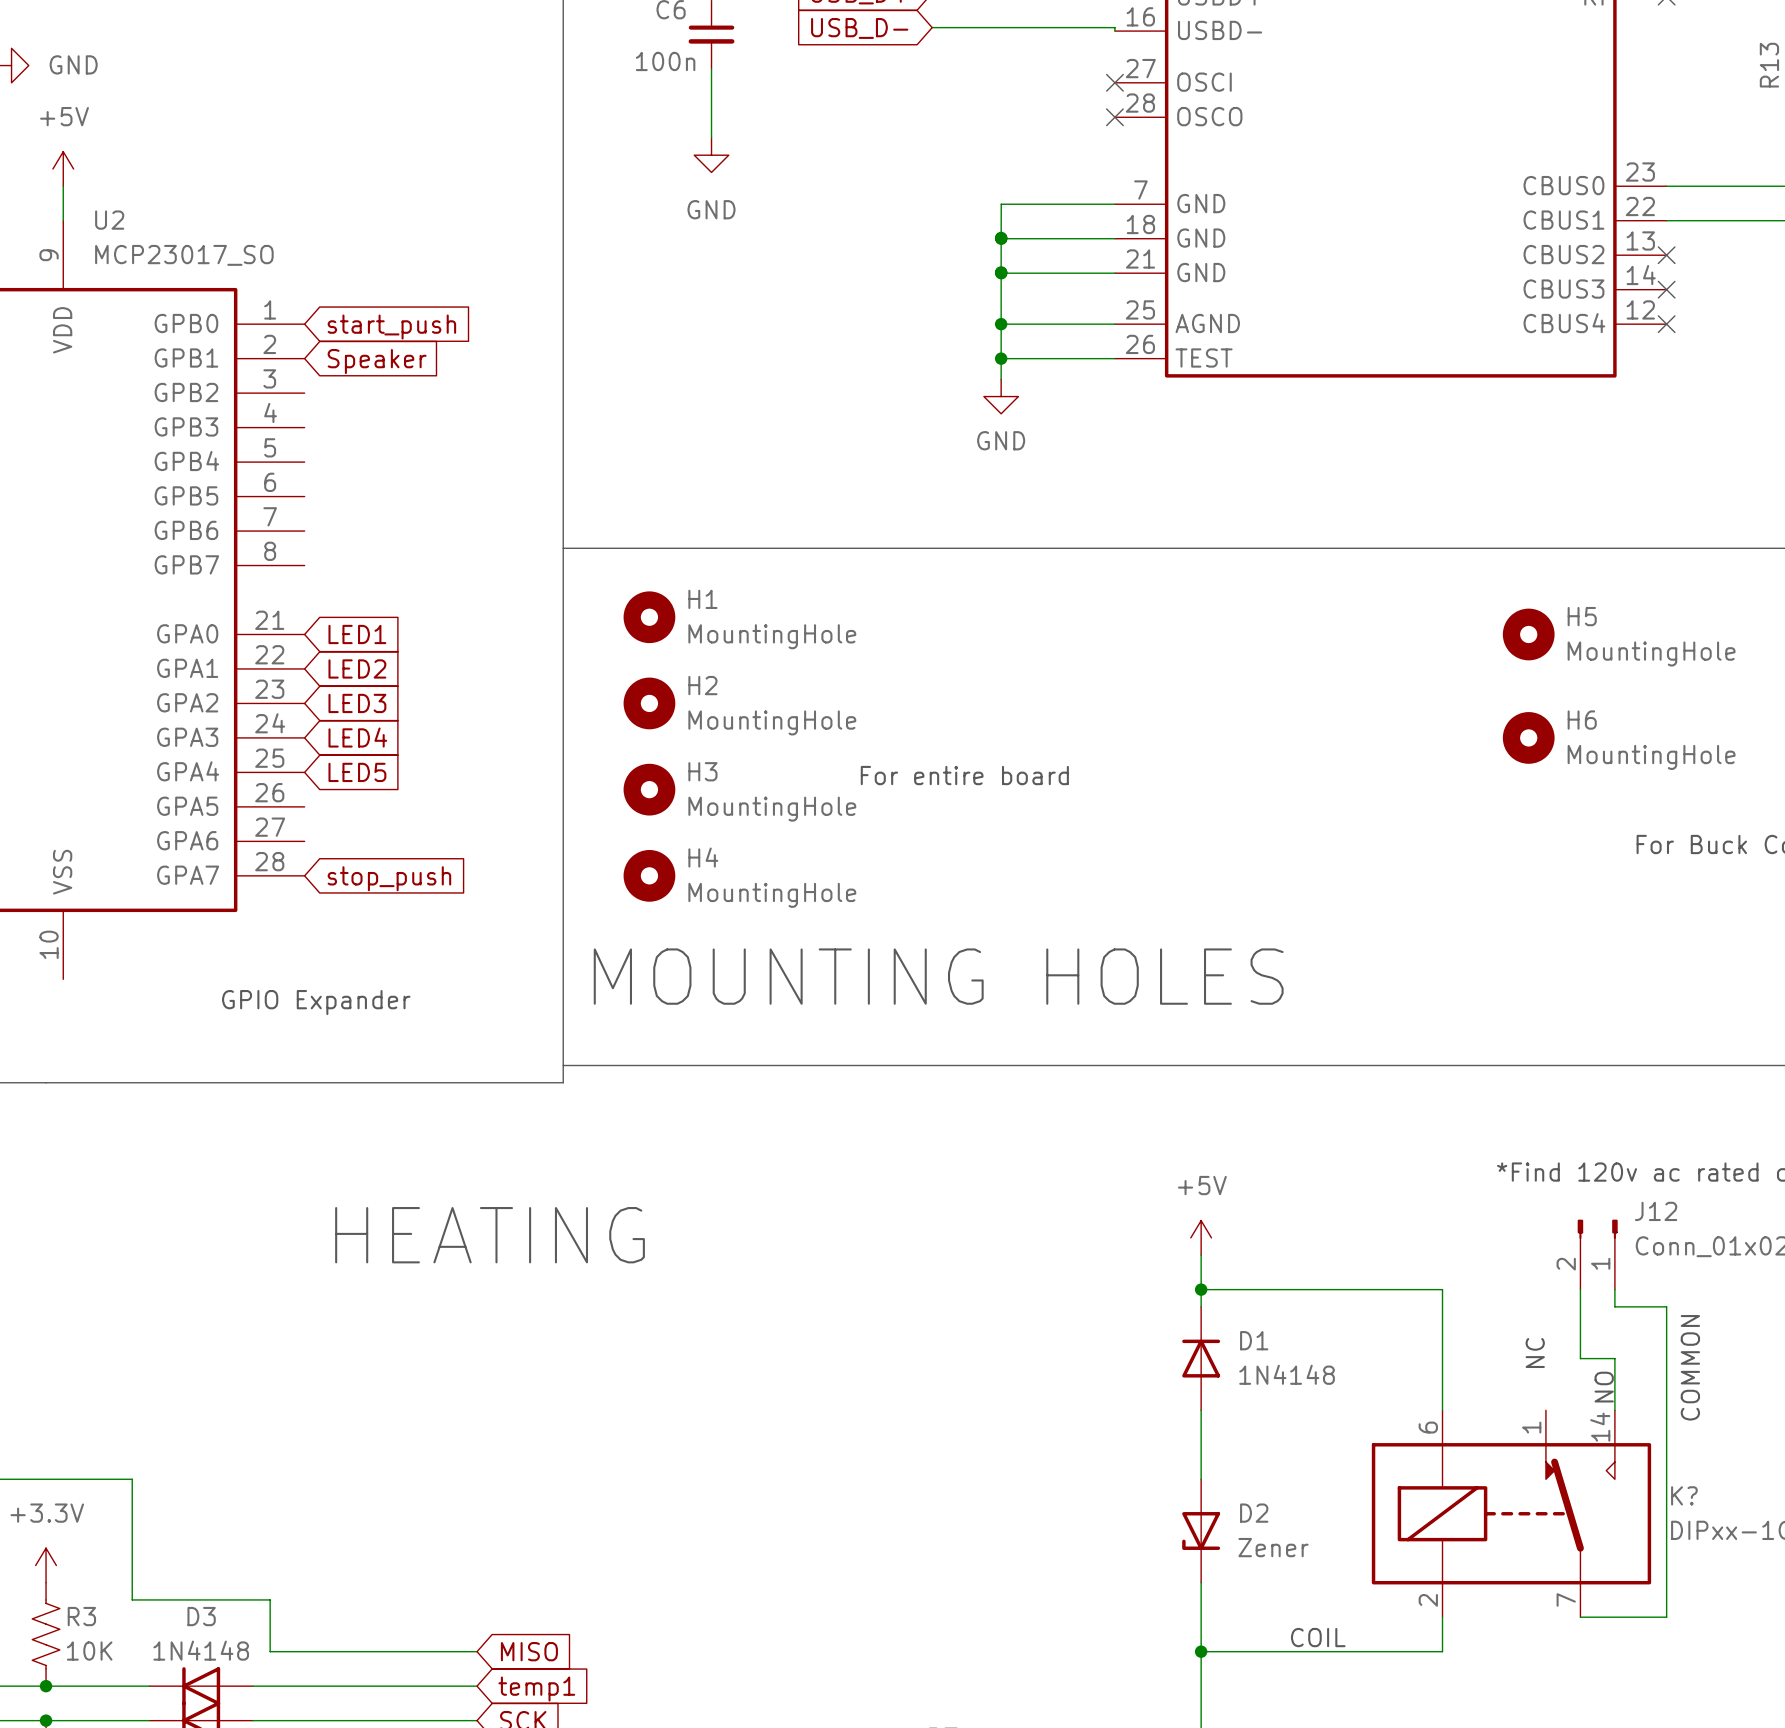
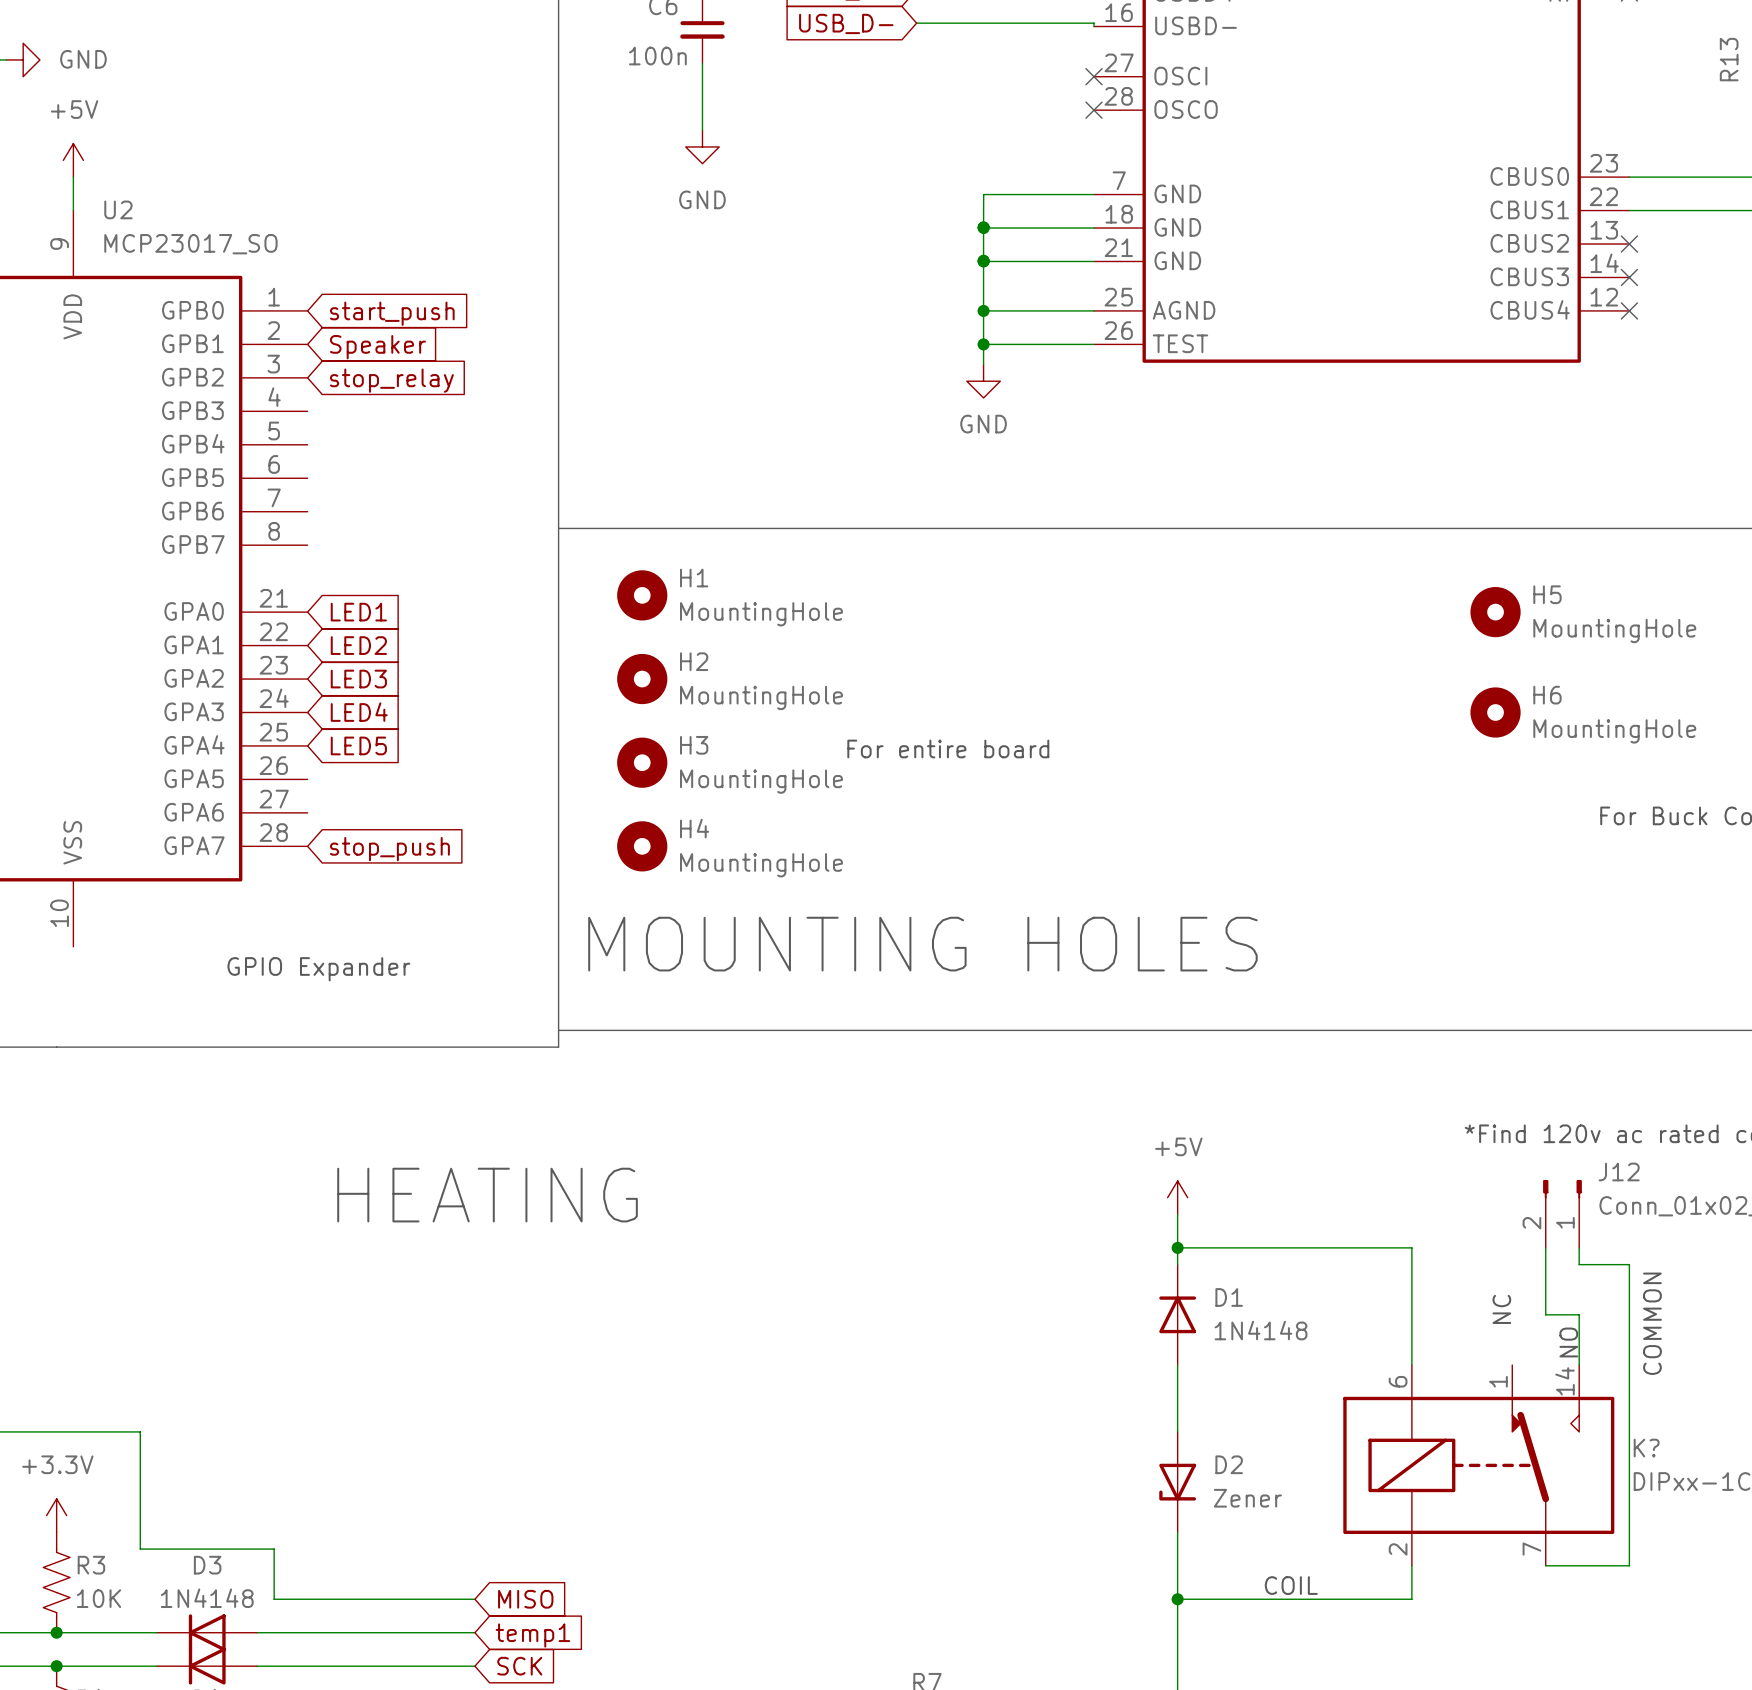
global label: none -> stop_relay (391, 380)

